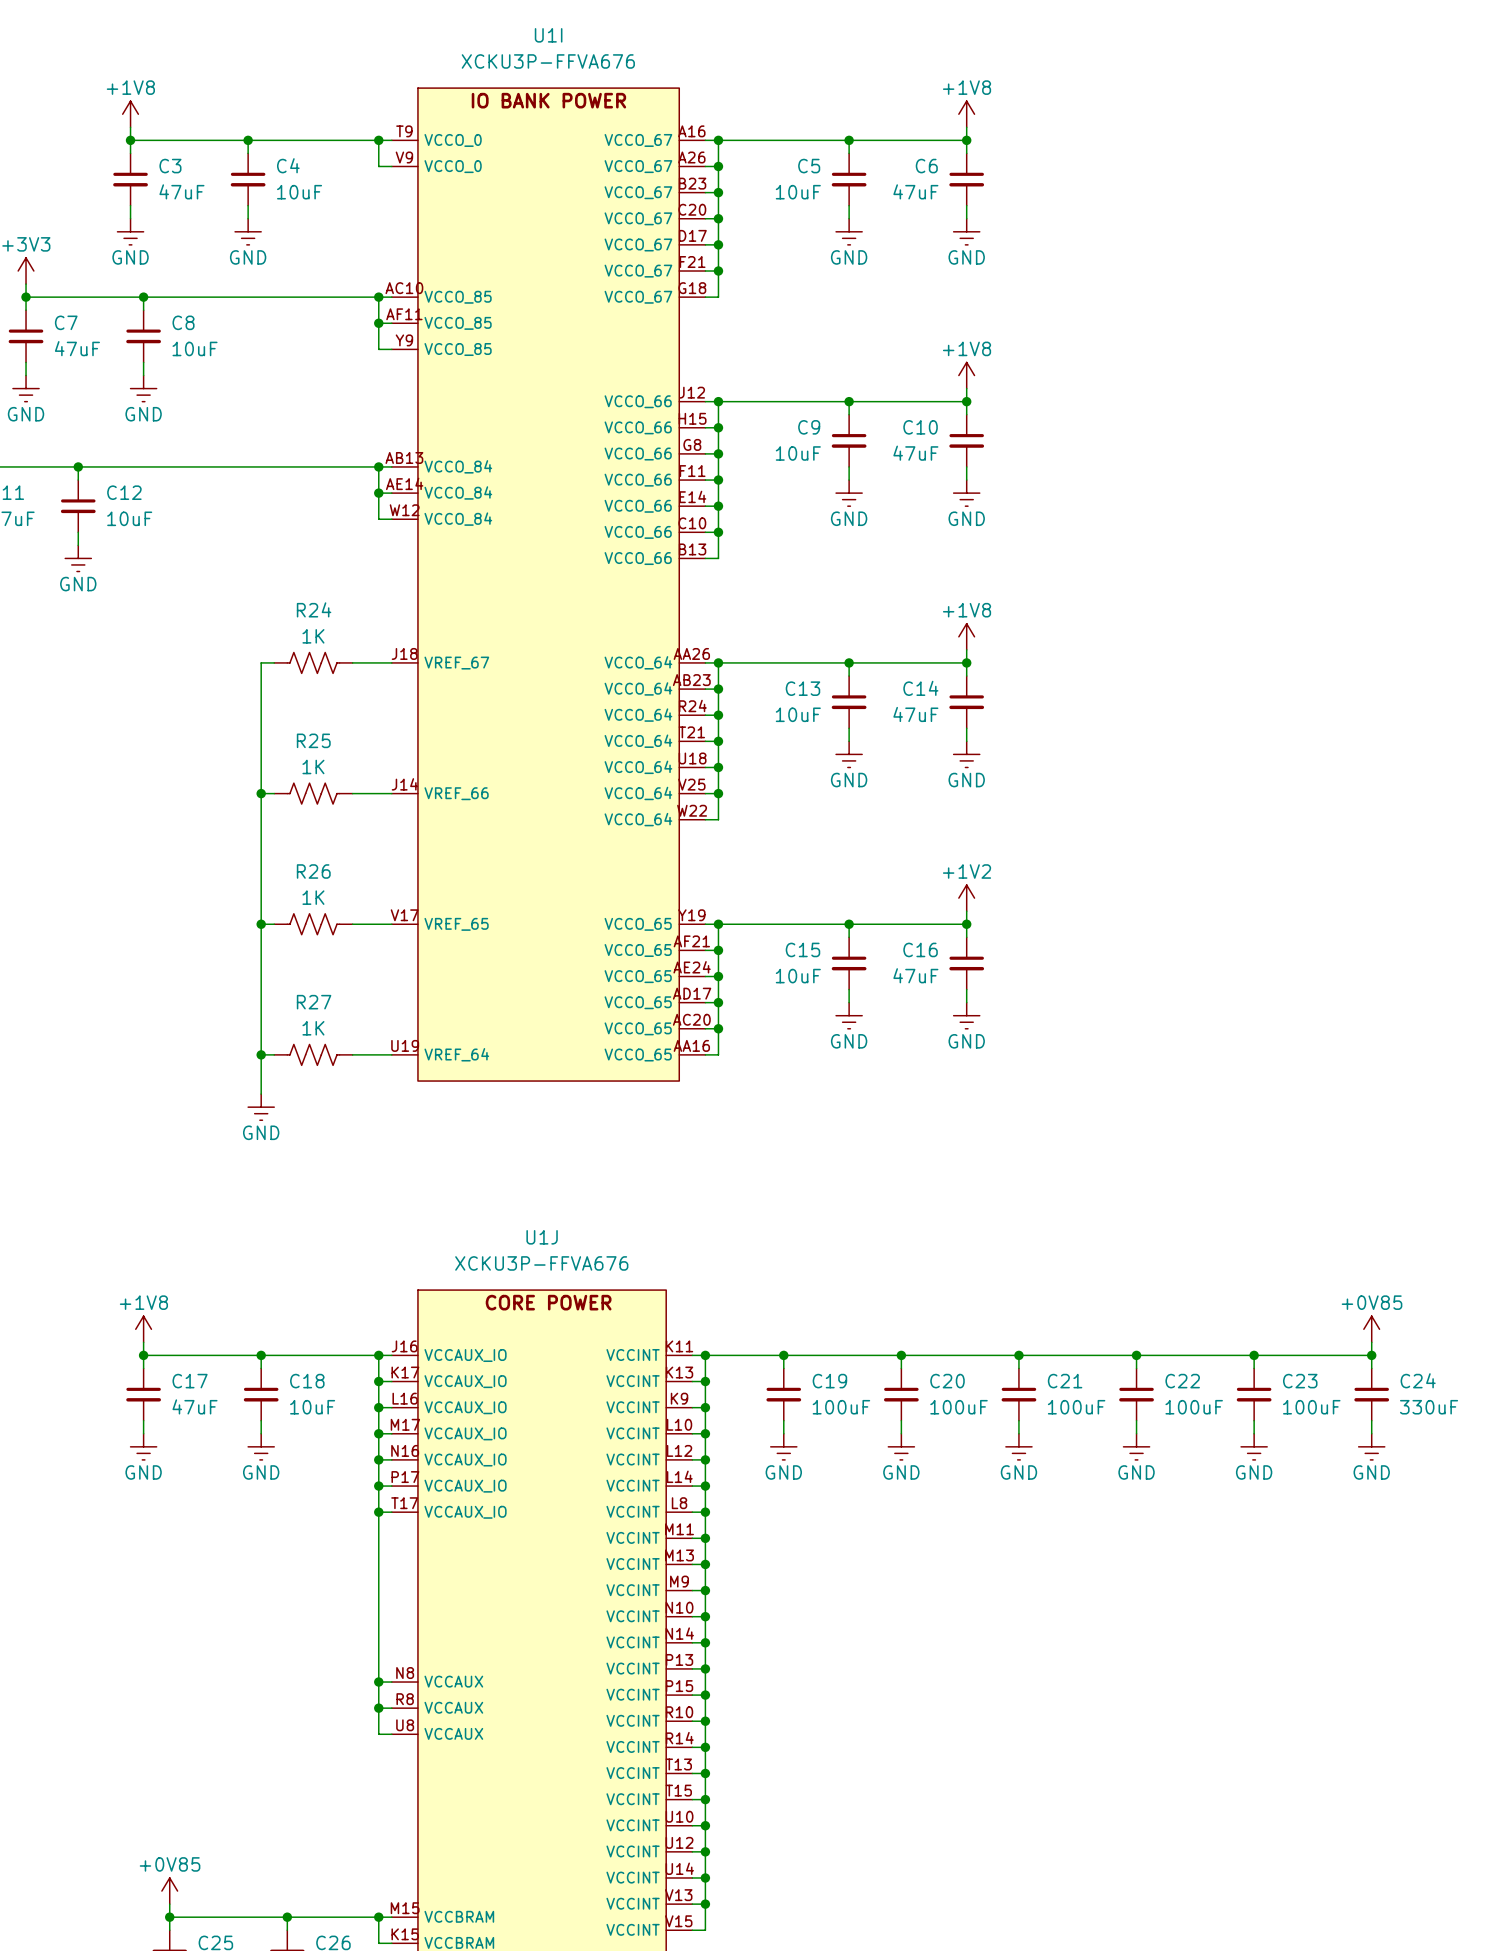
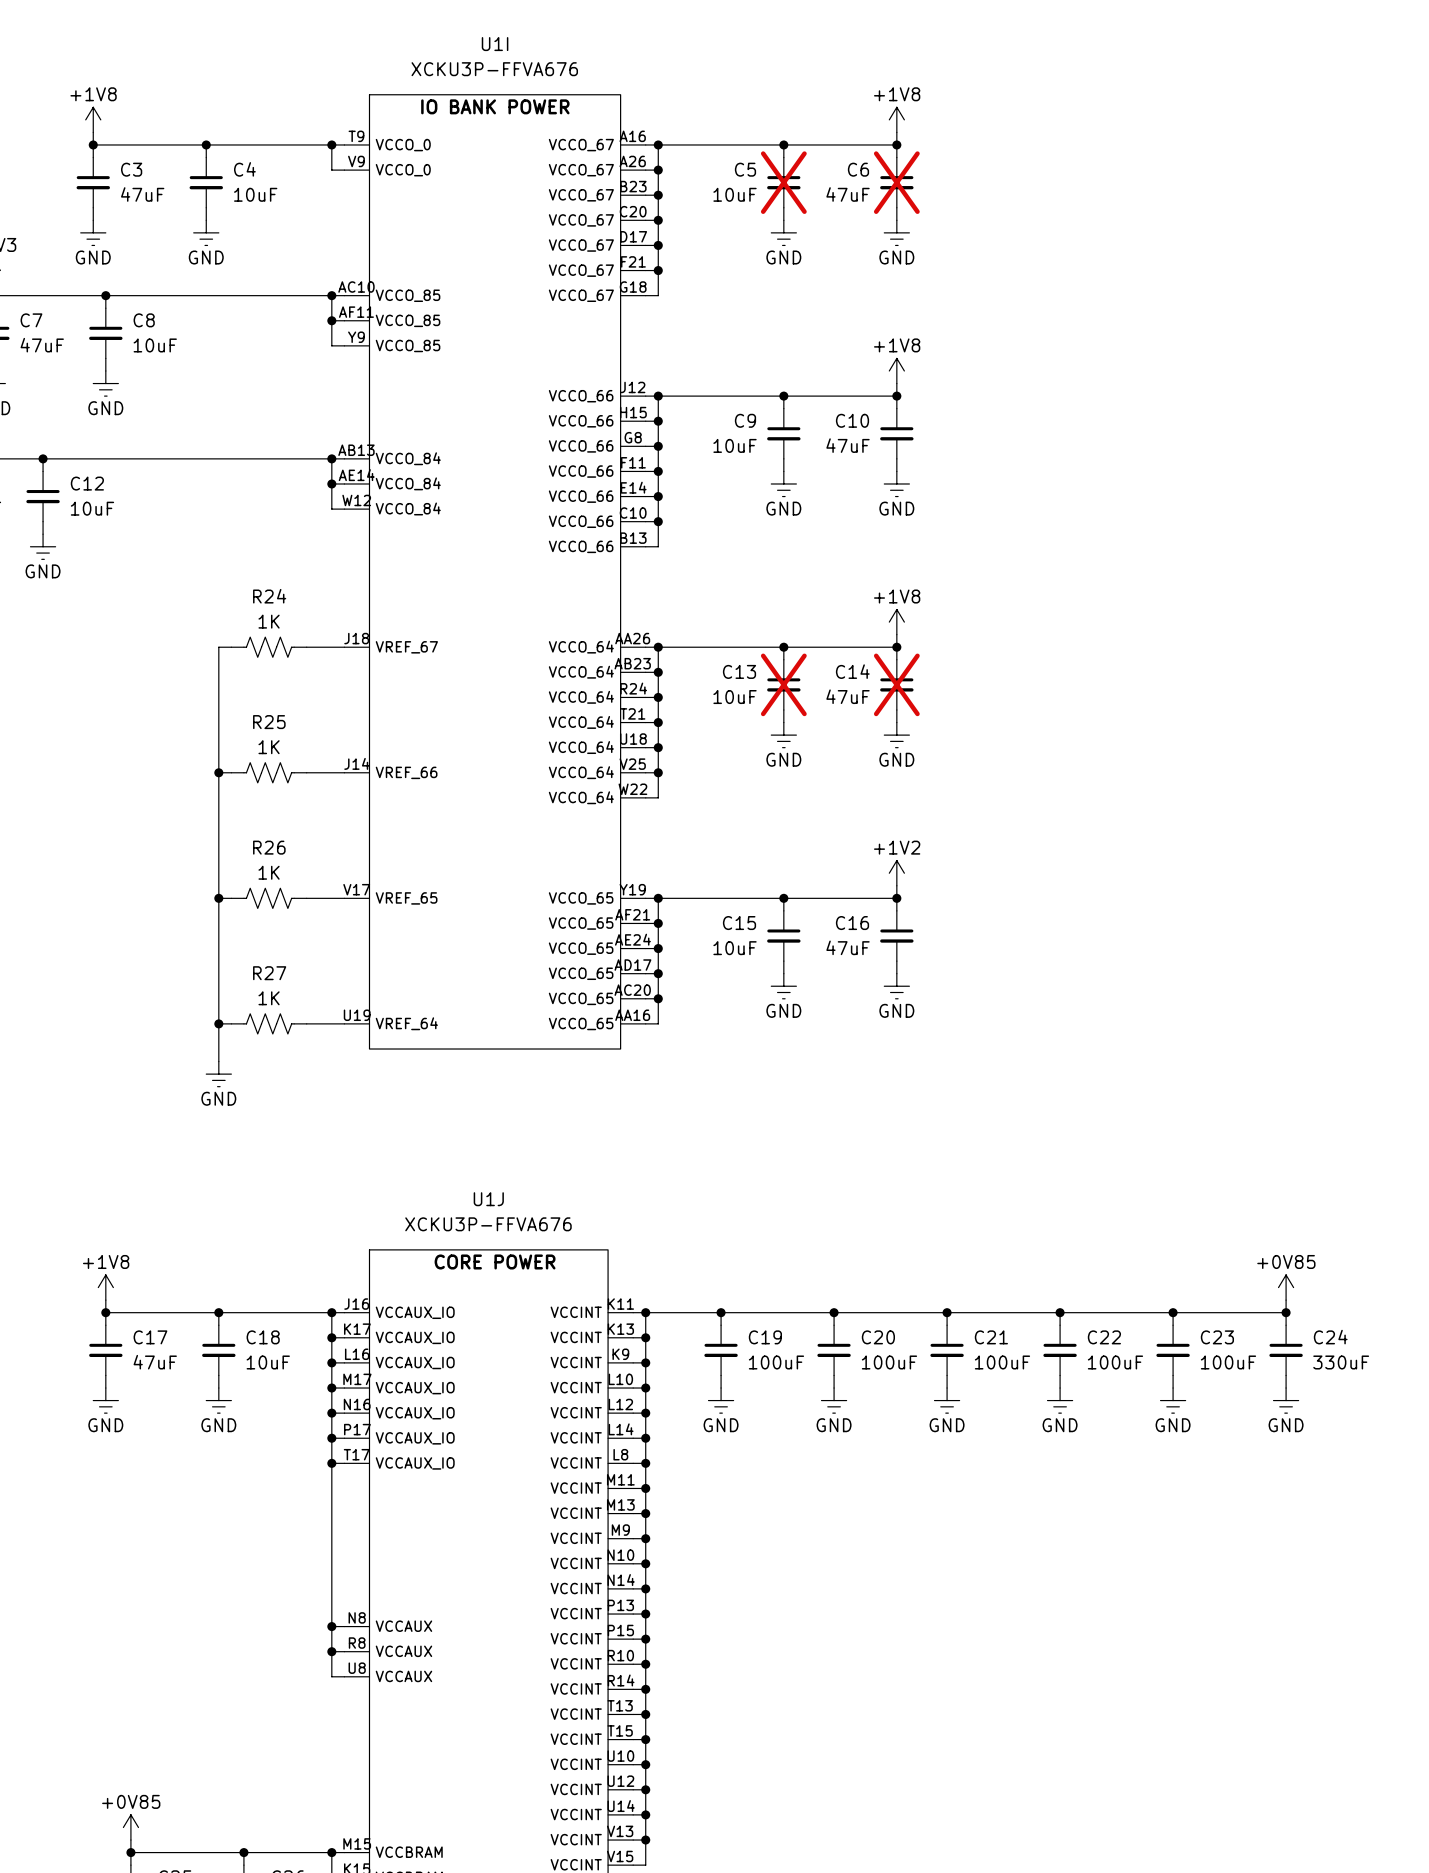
C5 do-not-place cross: none -> (783, 182)
C6 do-not-place cross: none -> (896, 182)
C13 do-not-place cross: none -> (783, 684)
C14 do-not-place cross: none -> (896, 684)

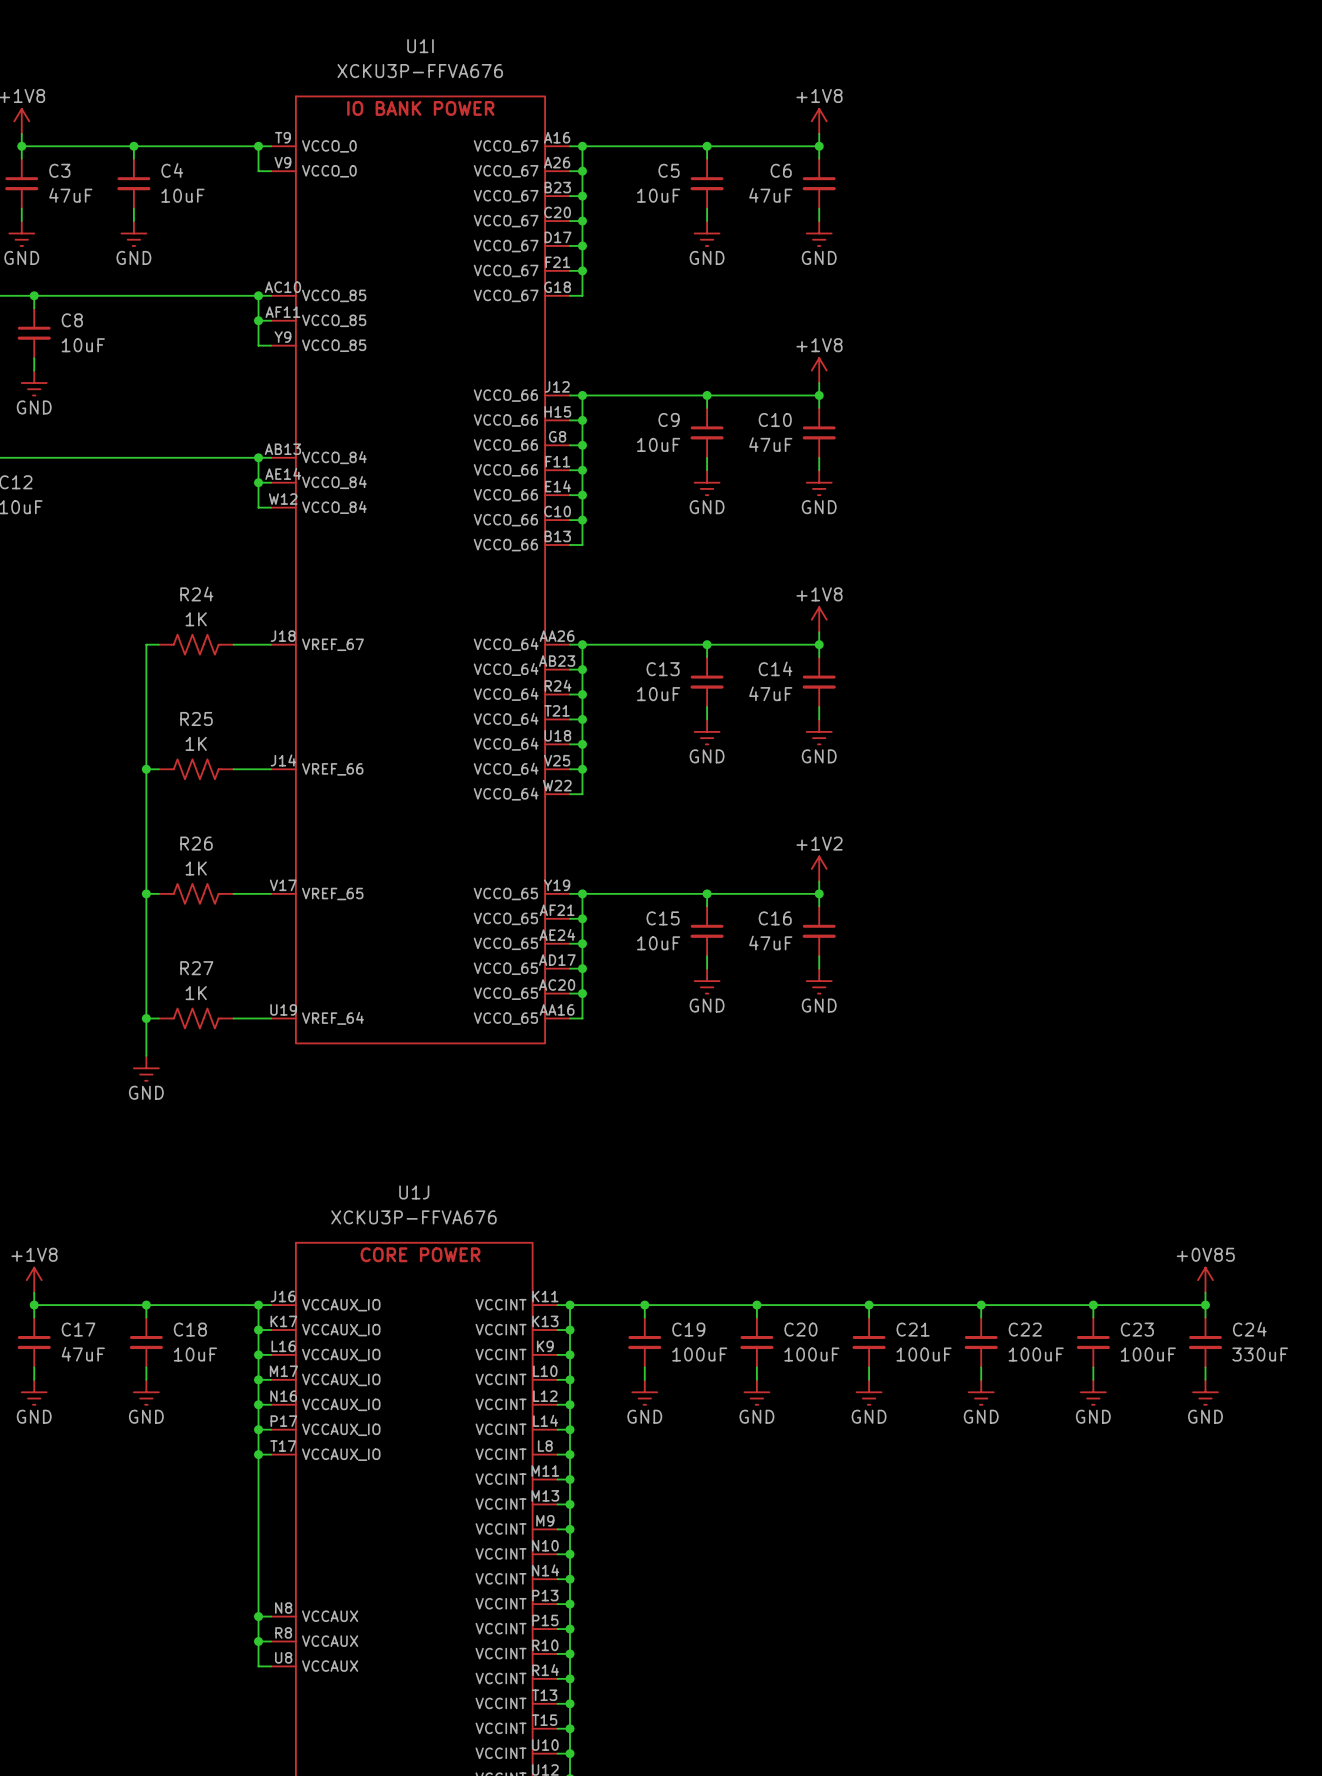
C5 do-not-place cross: (783, 182) -> none
C6 do-not-place cross: (896, 182) -> none
C13 do-not-place cross: (783, 684) -> none
C14 do-not-place cross: (896, 684) -> none

